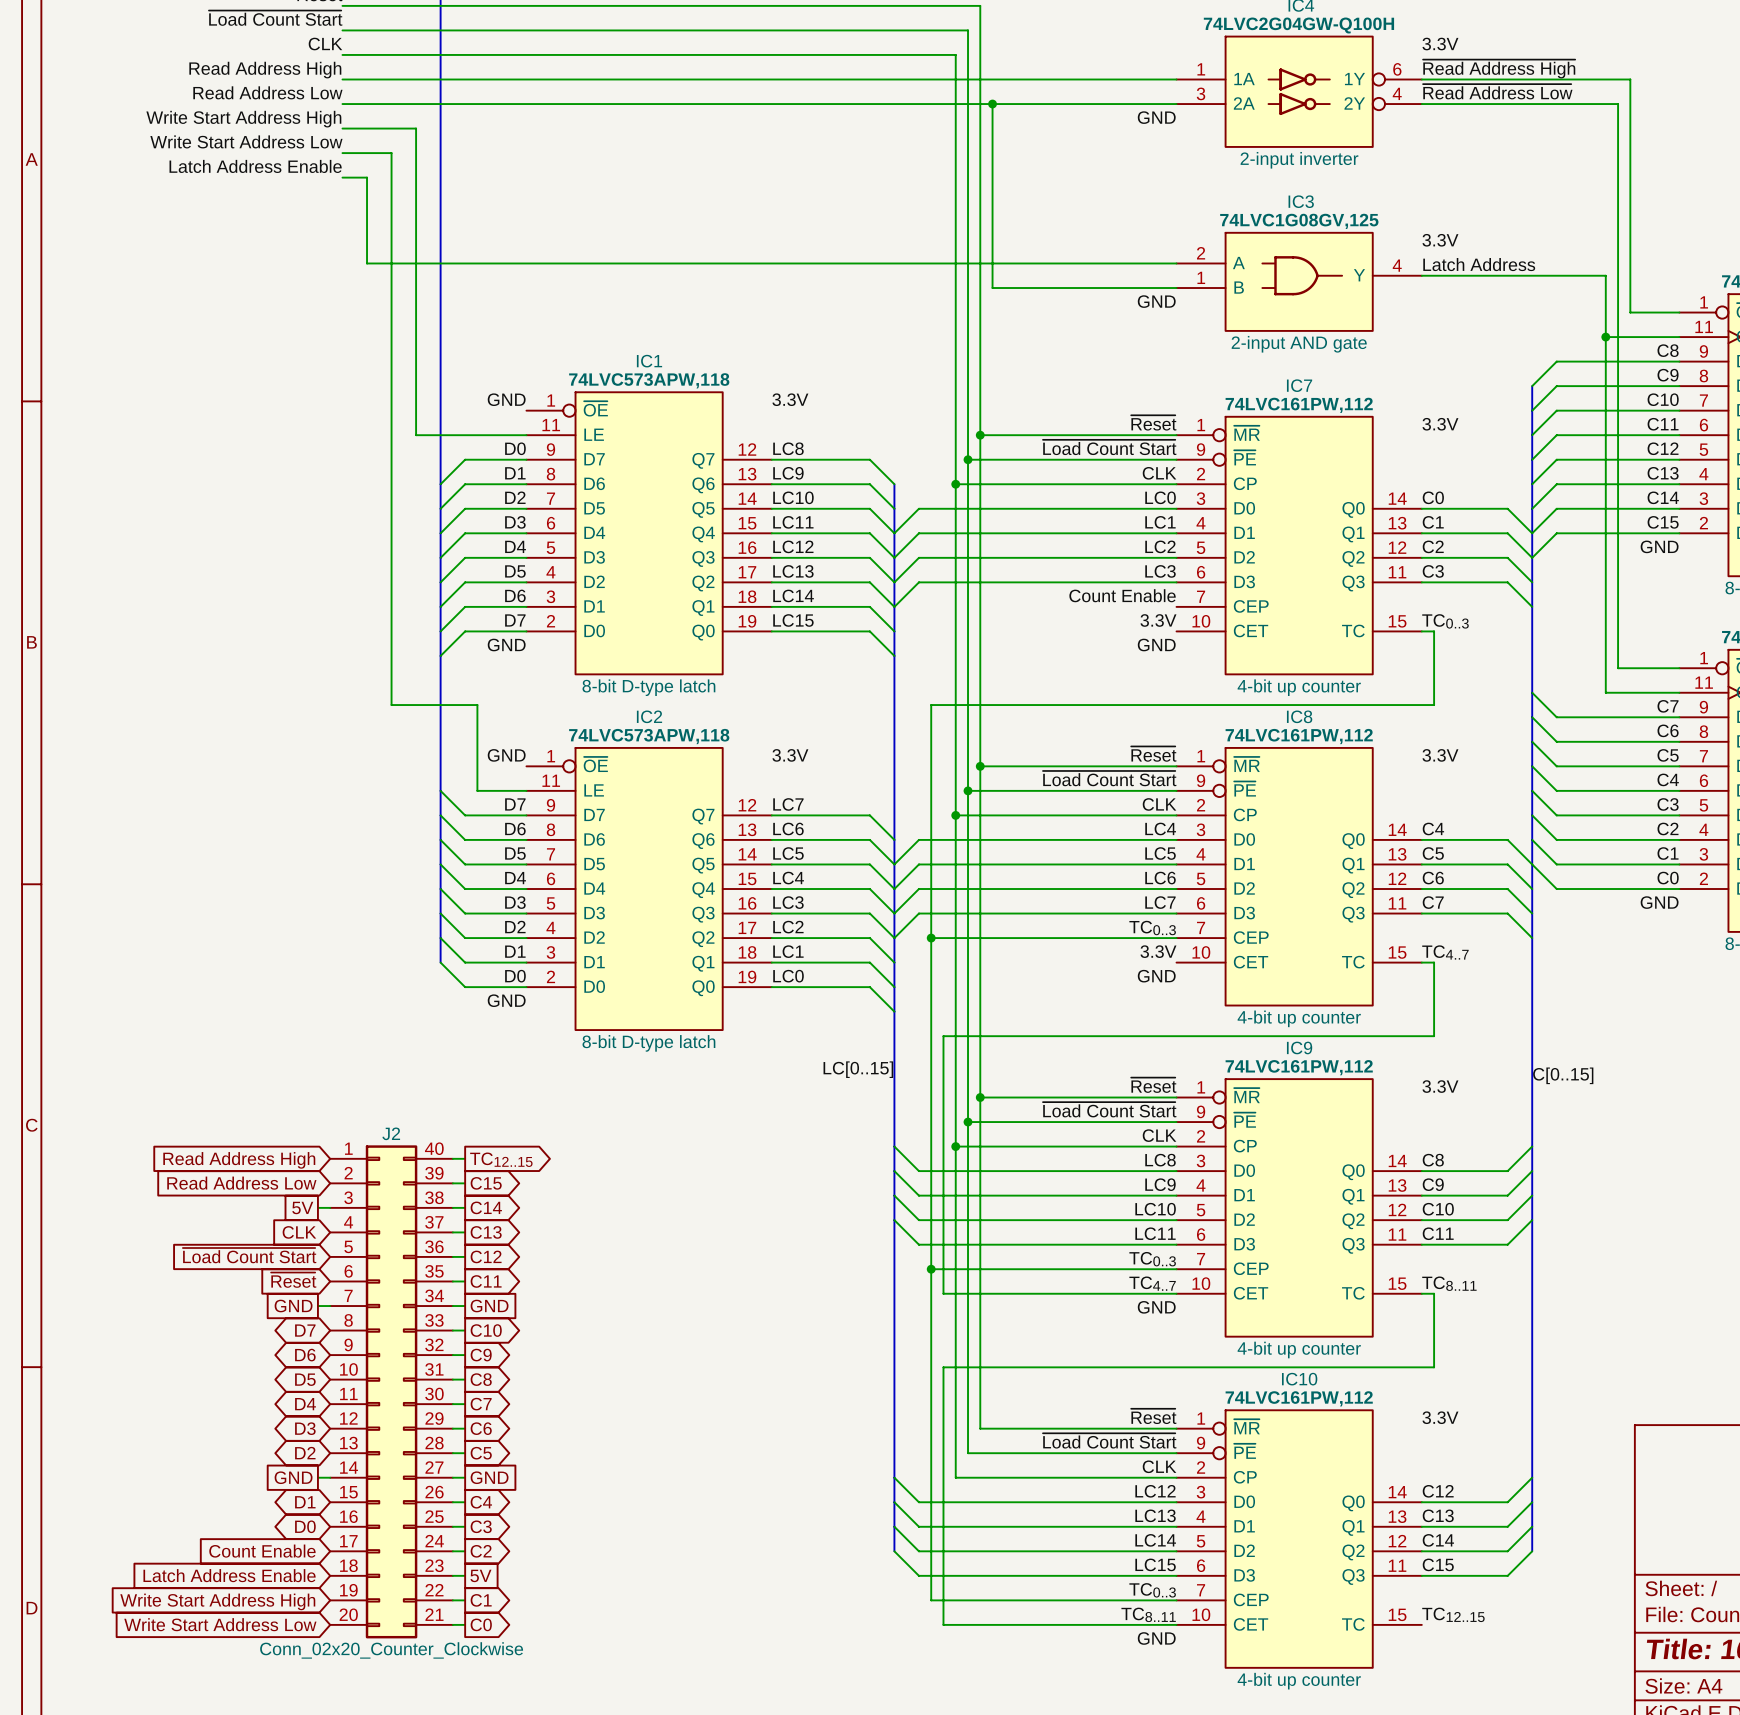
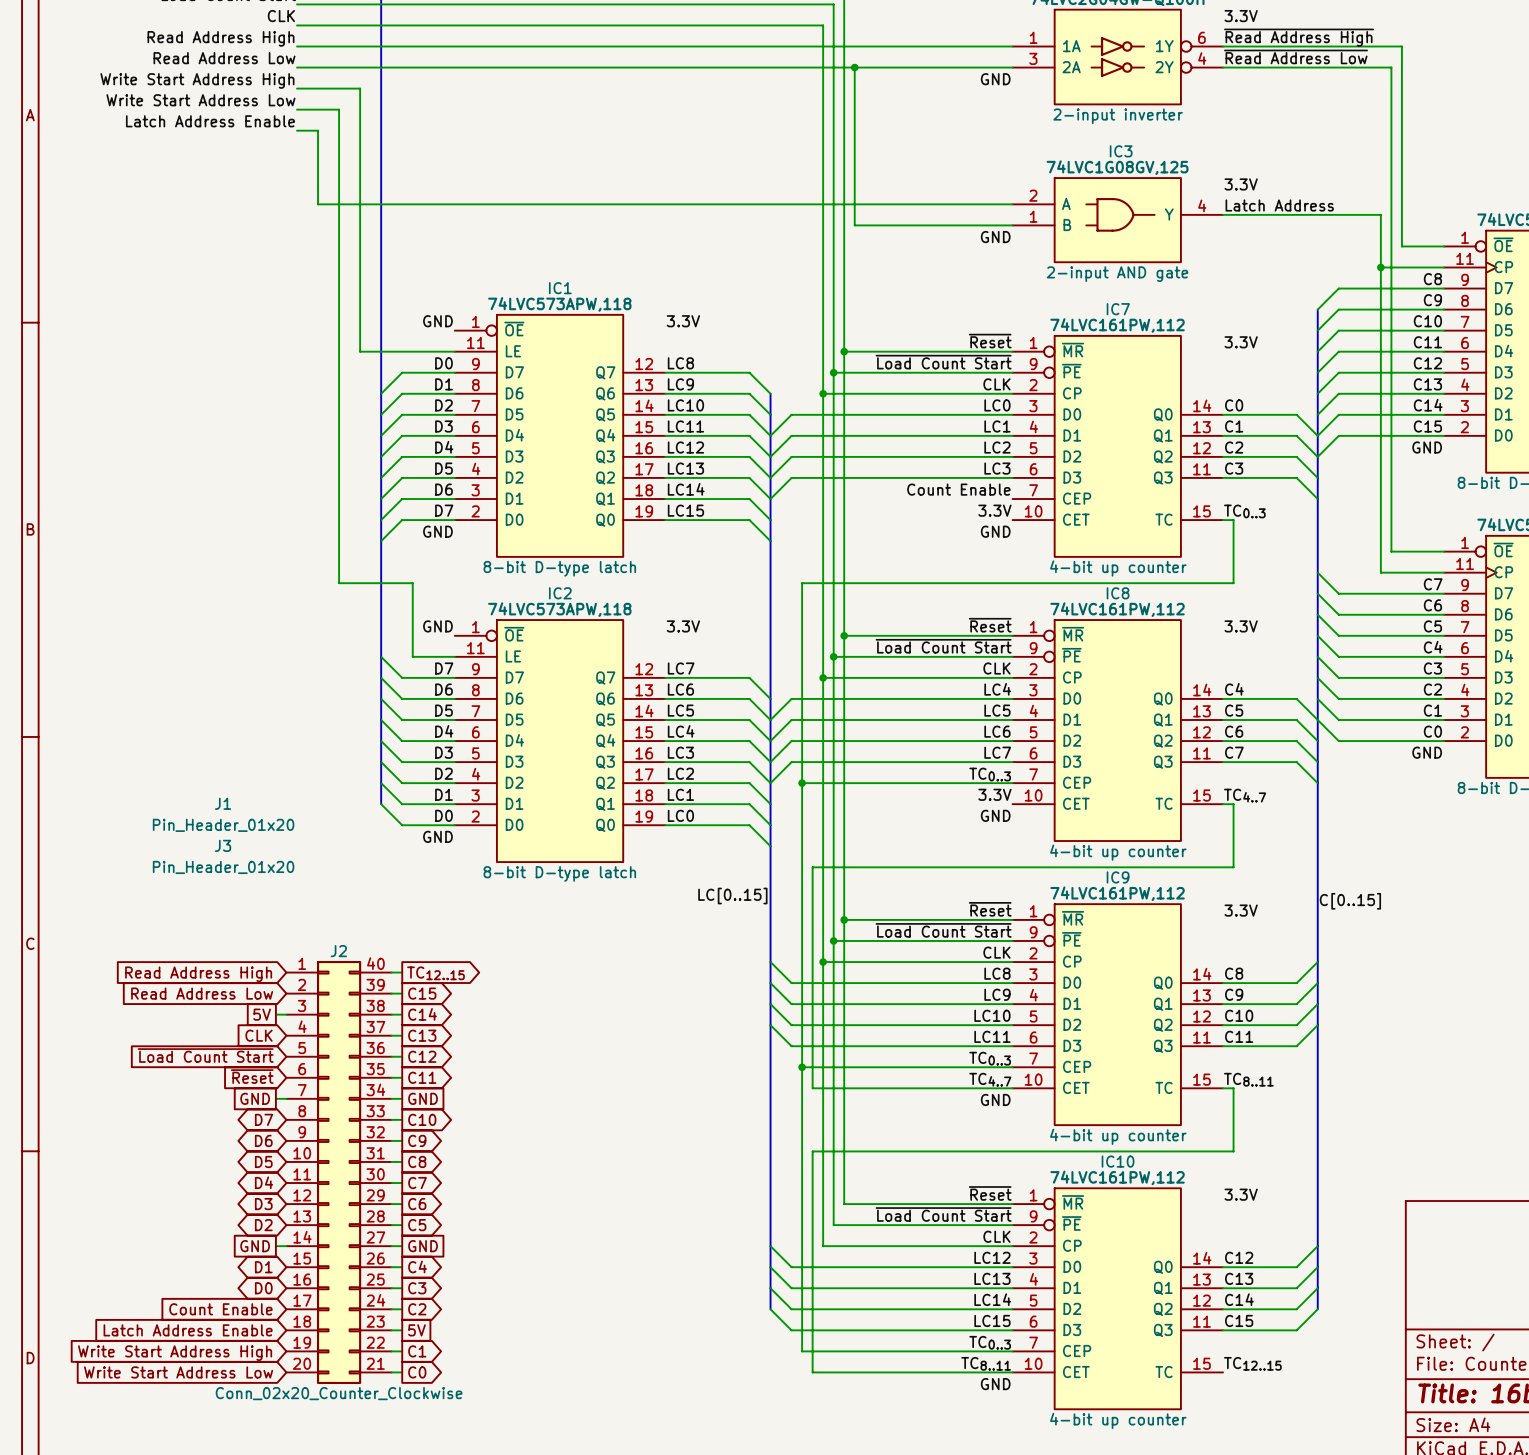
J1: none -> Pin_Header_01x20 (223, 814)
J3: none -> Pin_Header_01x20 (223, 856)

